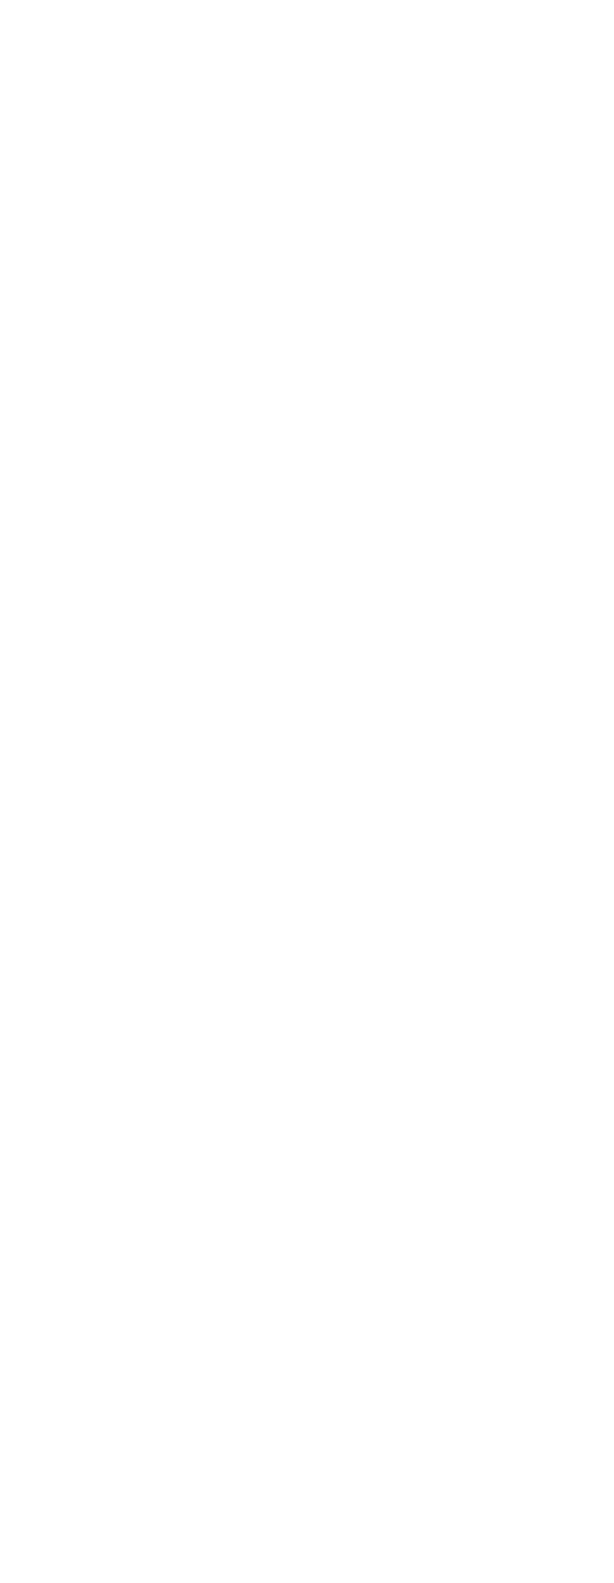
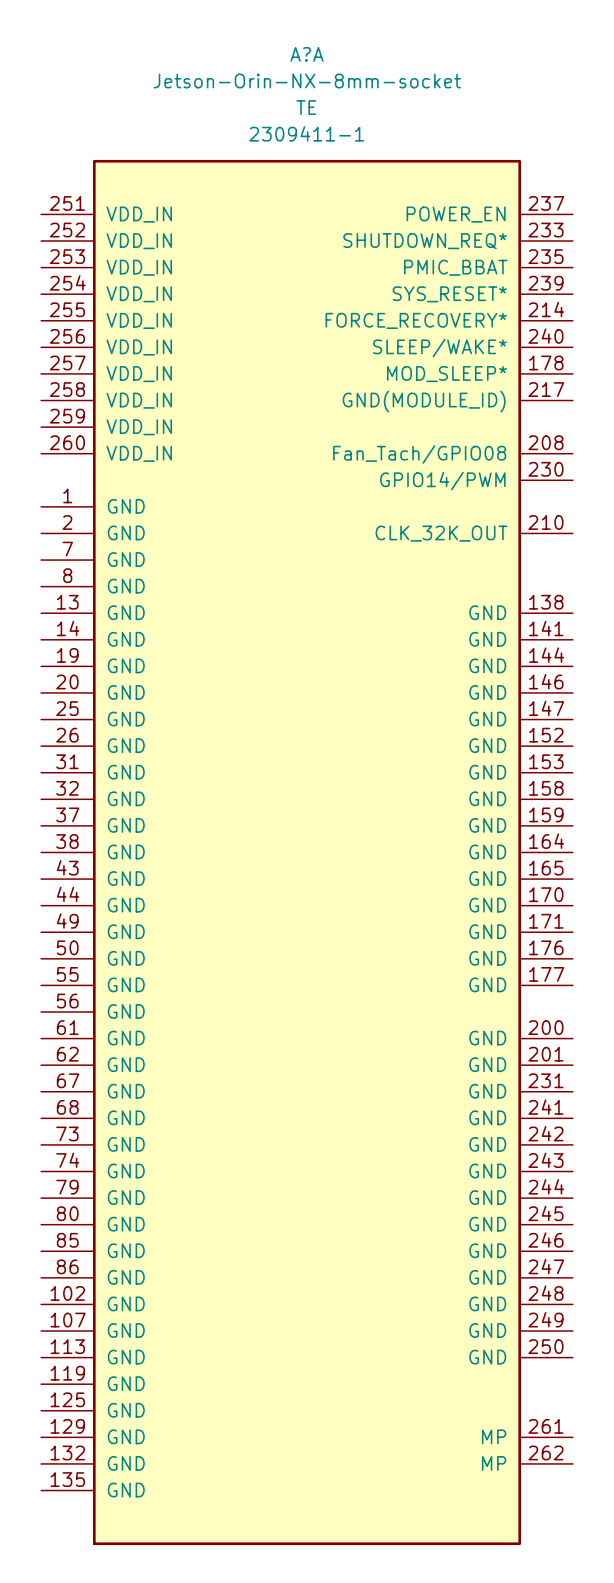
A?A: none -> Jetson-Orin-NX-8mm-socket (307, 852)

